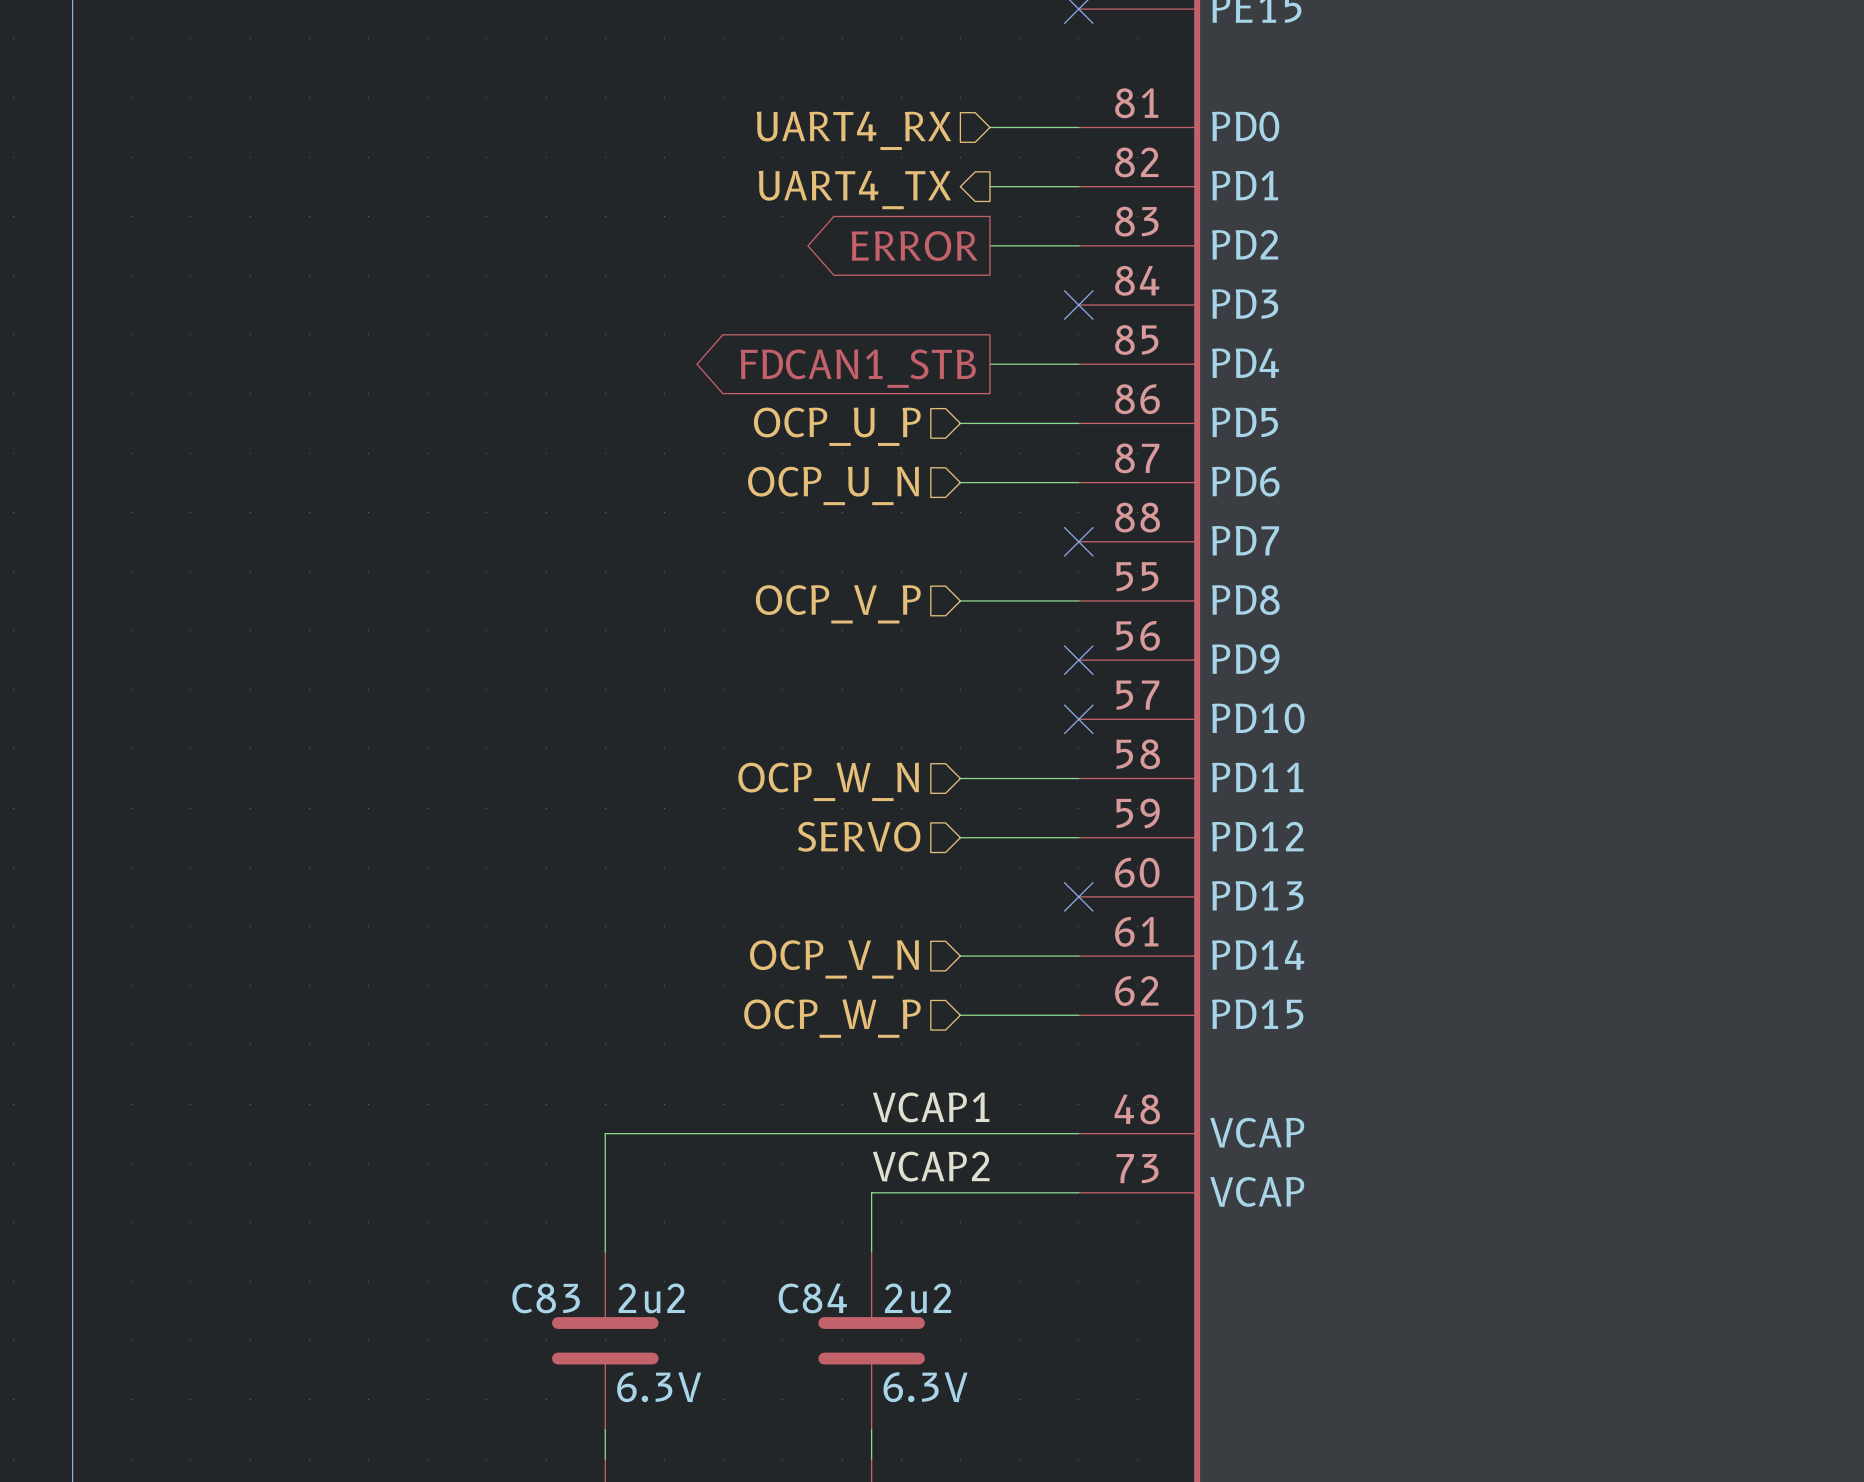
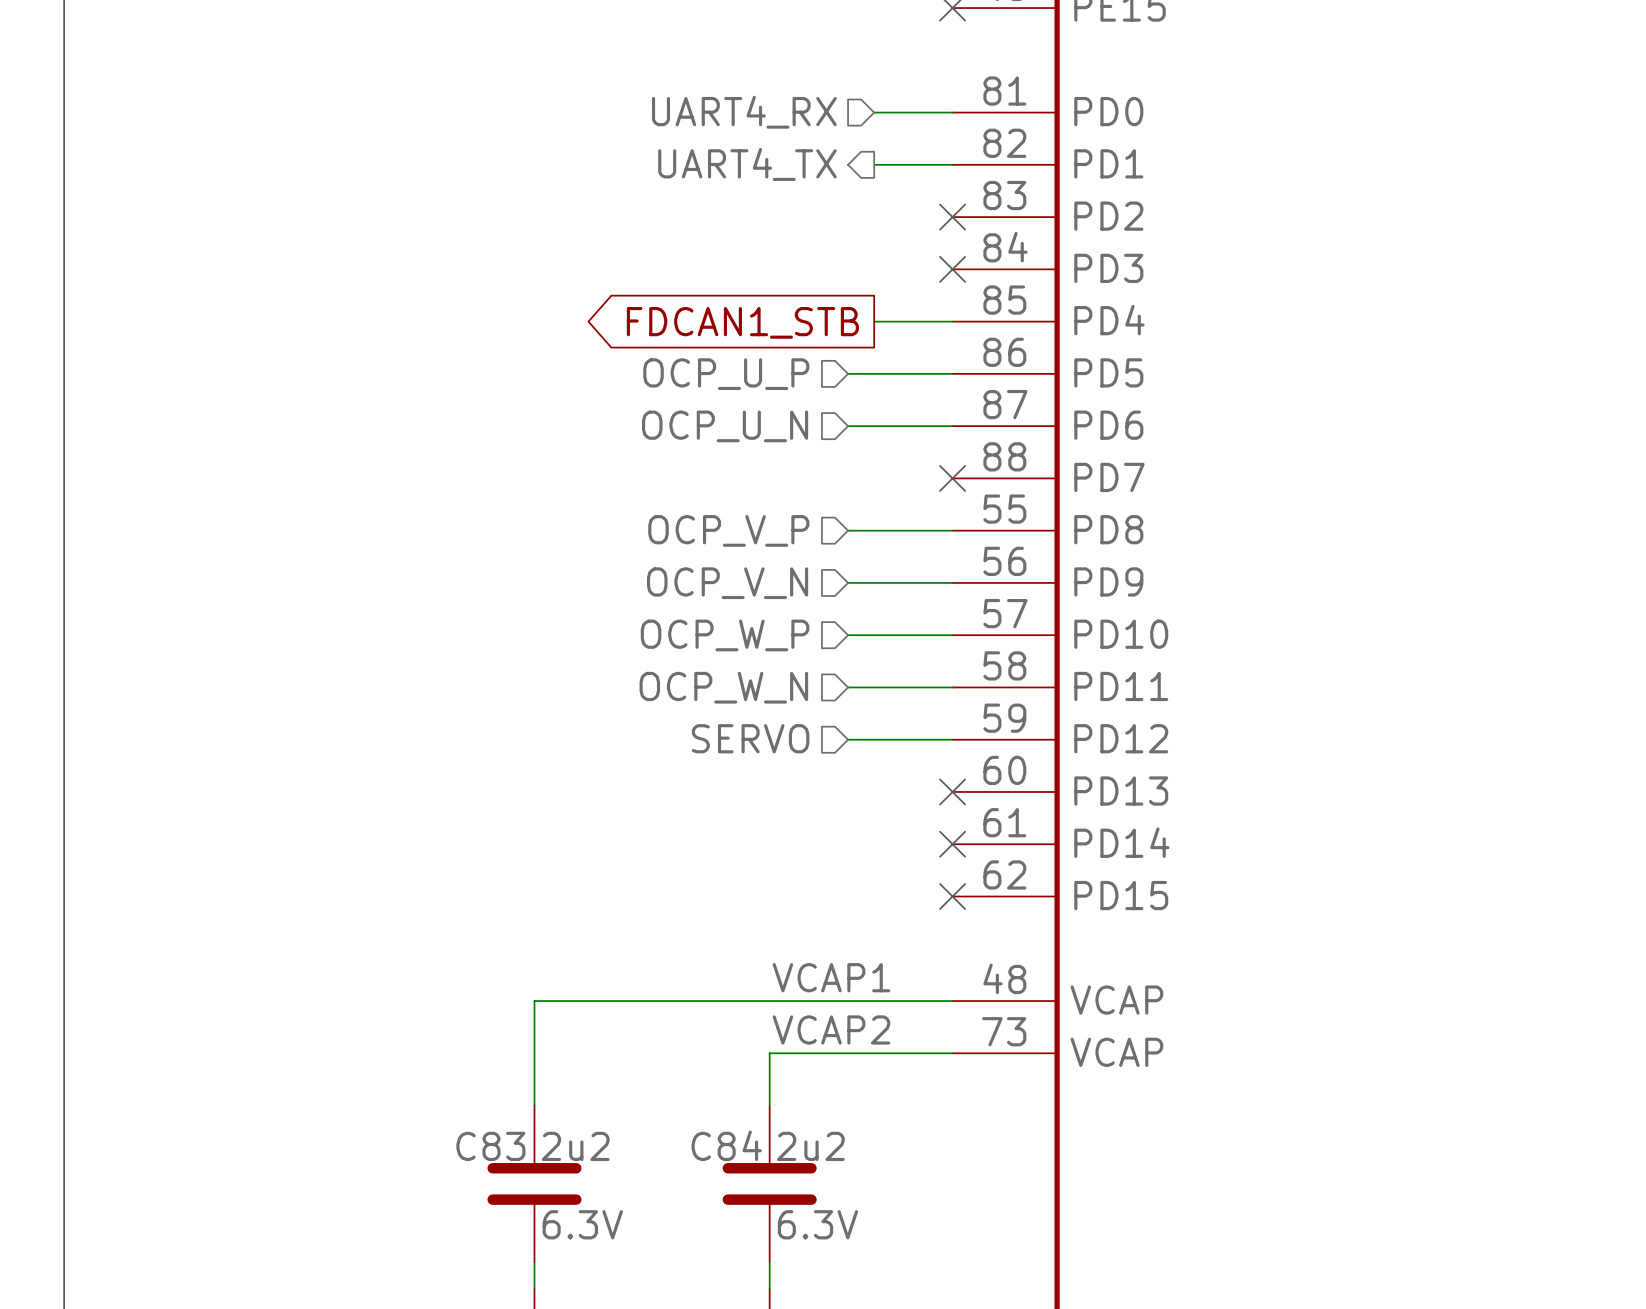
wire: (989, 245) (1078, 245) -> none
no-connect mark: none -> (952, 217)
global label: ERROR (914, 246) -> none
no-connect mark: (1078, 660) -> none
no-connect mark: (1078, 719) -> none
wire: (960, 956) (1078, 956) -> (848, 635) (952, 635)
no-connect mark: none -> (952, 844)
hierarchical label position: OCP_V_N (834, 959) -> OCP_V_N (727, 583)
wire: (960, 1015) (1078, 1015) -> (848, 582) (952, 582)
no-connect mark: none -> (952, 896)
hierarchical label position: OCP_W_P (832, 1018) -> OCP_W_P (725, 635)

